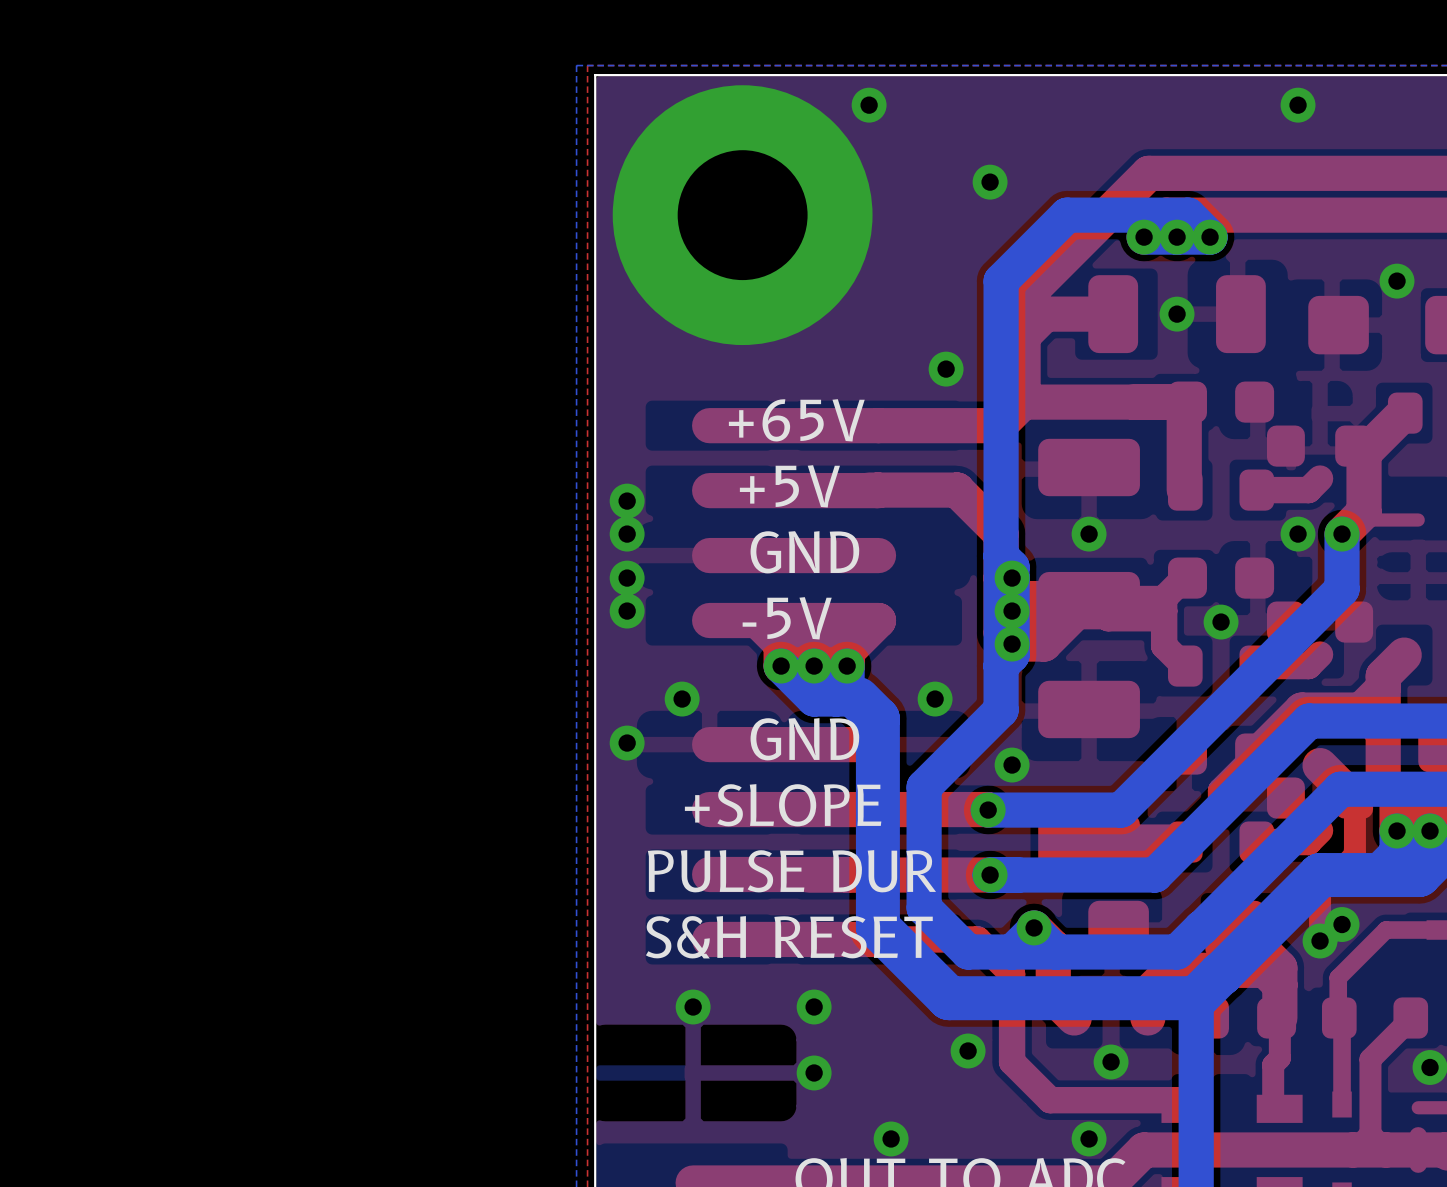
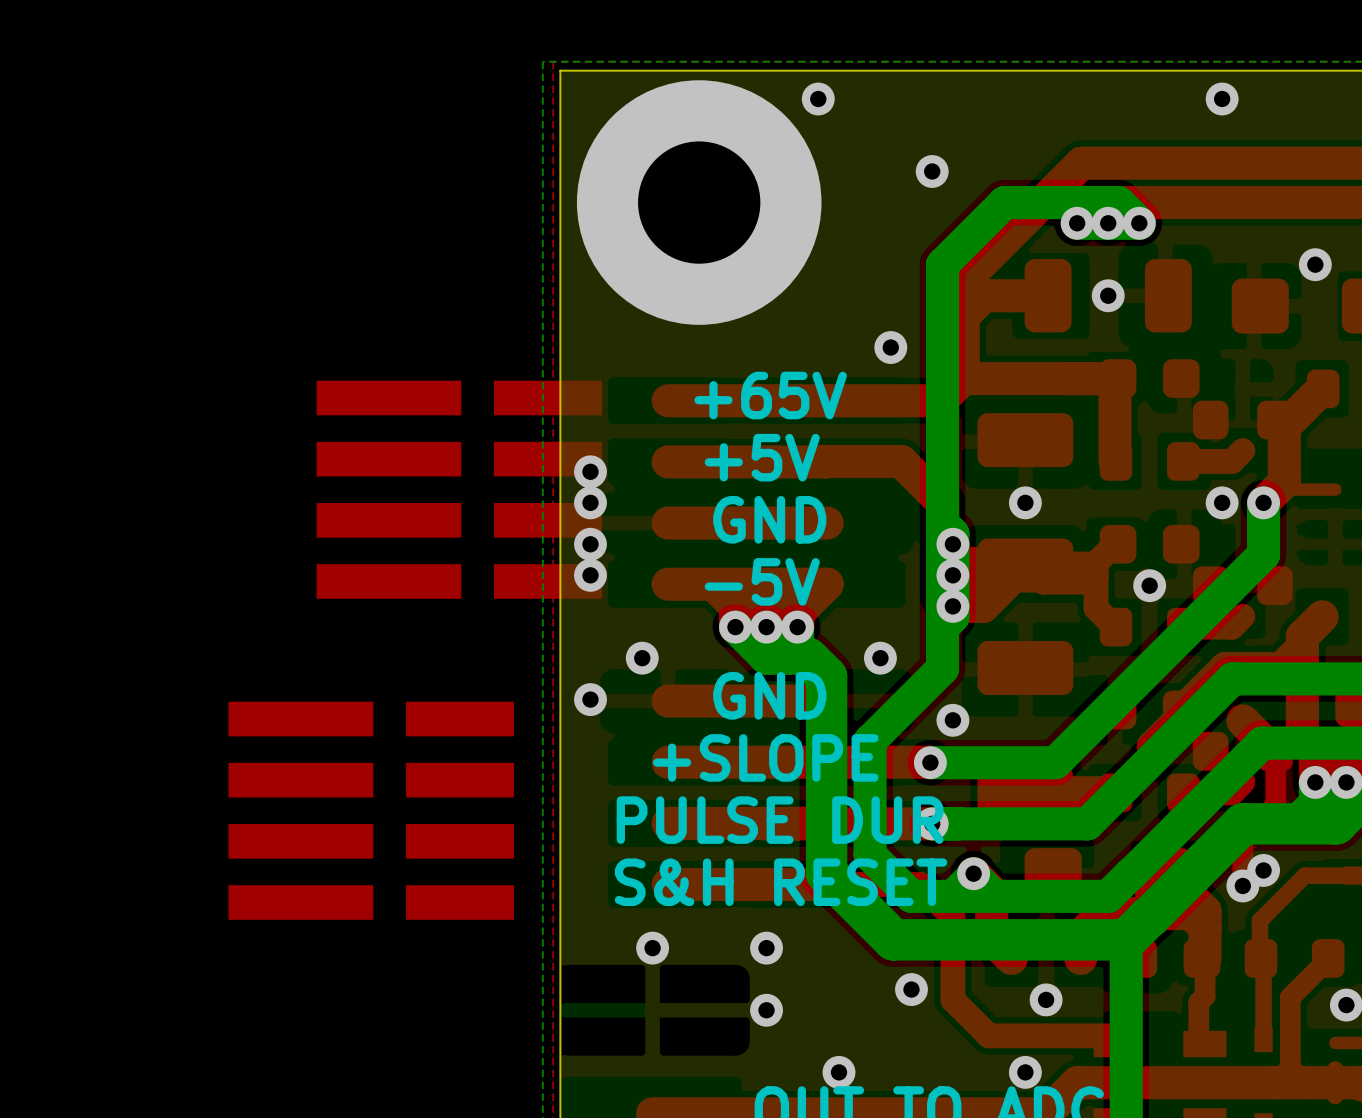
part: none -> (459, 489)
part: none -> (371, 810)

